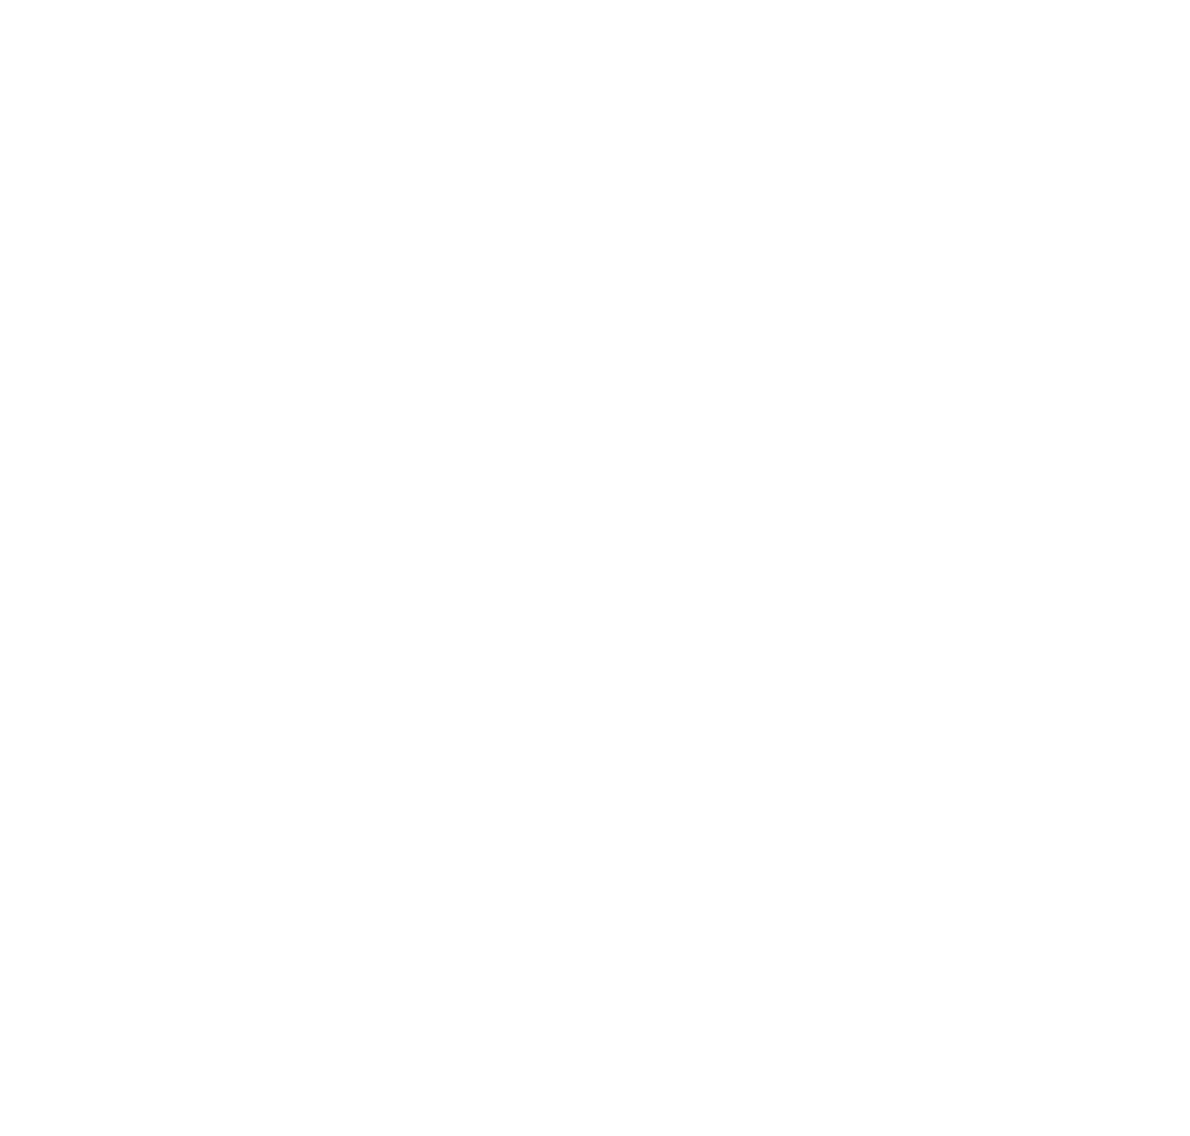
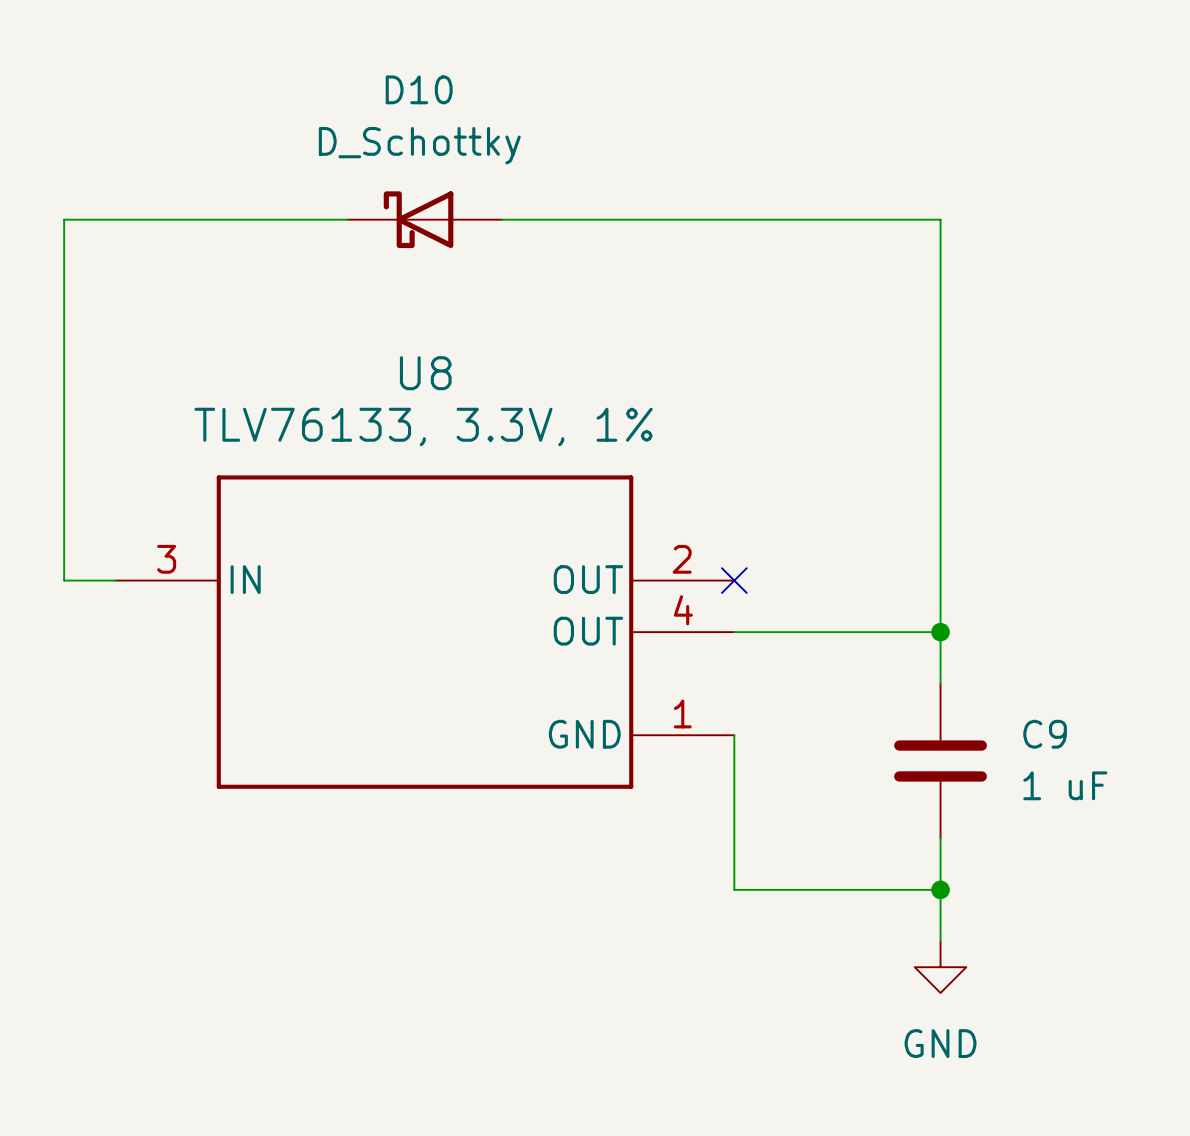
wire: none -> (347, 219) (64, 219) (64, 580) (115, 580)
D10: none -> D_Schottky (425, 219)
wire: none -> (502, 219) (940, 219) (940, 683)
no-connect mark: none -> (734, 580)
U8: none -> TLV76133, 3.3V, 1% (425, 632)
wire: none -> (734, 632) (940, 632)
junction: none -> (940, 632)
wire: none -> (734, 735) (734, 889) (940, 889)
C9: none -> 1 uF (940, 761)
wire: none -> (940, 838) (940, 941)
junction: none -> (940, 889)
power symbol: none -> GND (940, 967)

